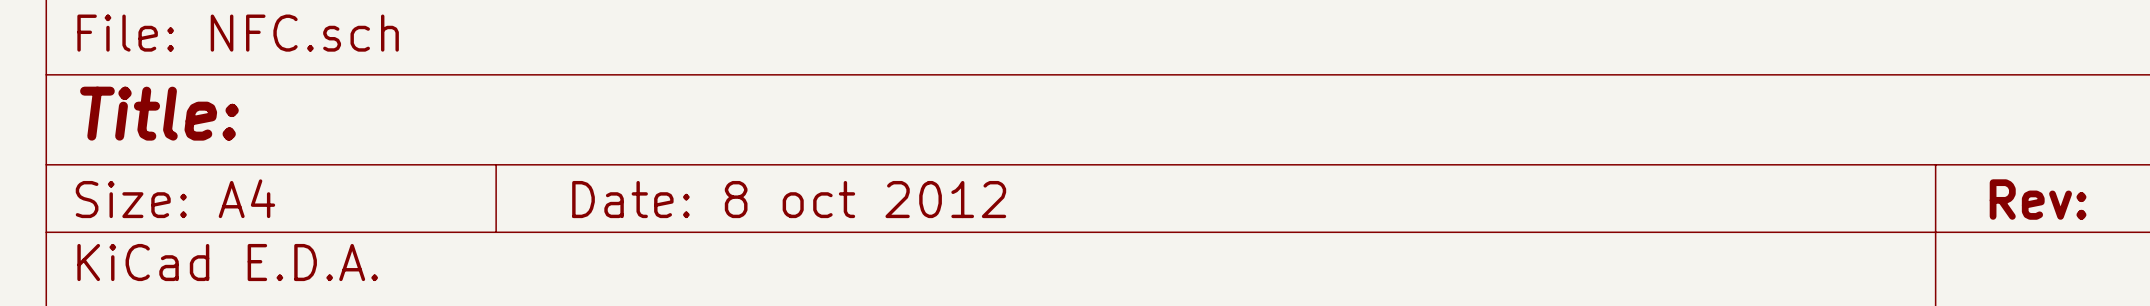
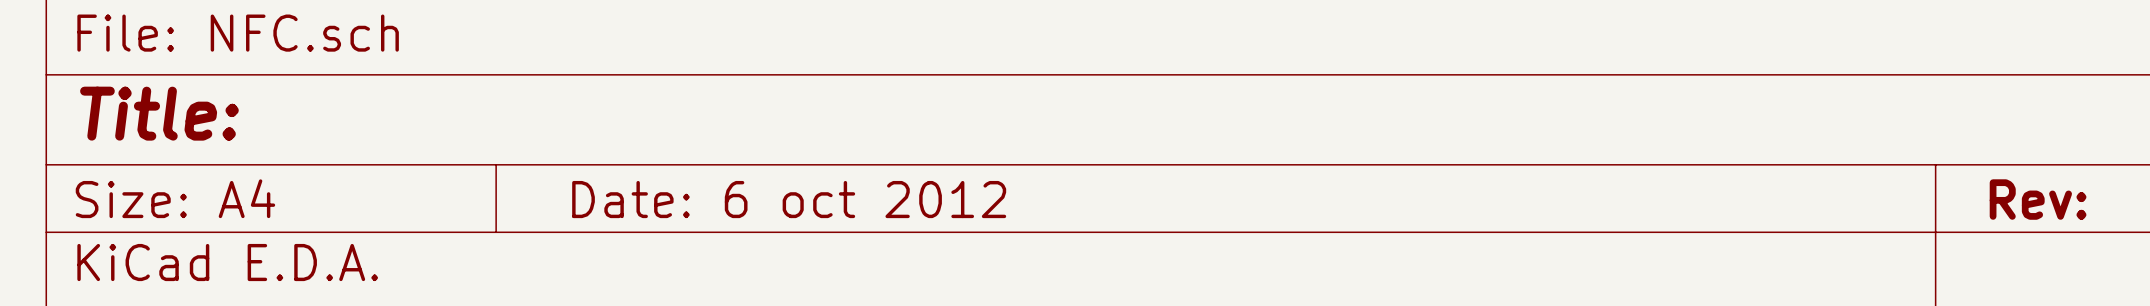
title block: Date: 8 oct 2012 (789, 199) -> Date: 6 oct 2012 (789, 199)

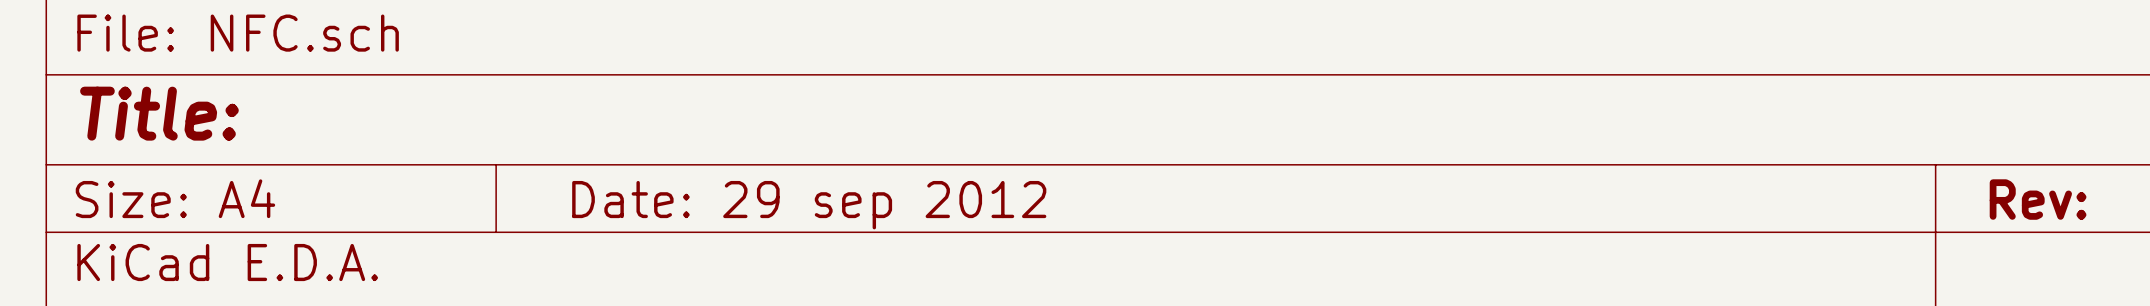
title block: Date: 6 oct 2012 (789, 199) -> Date: 29 sep 2012 (809, 205)

